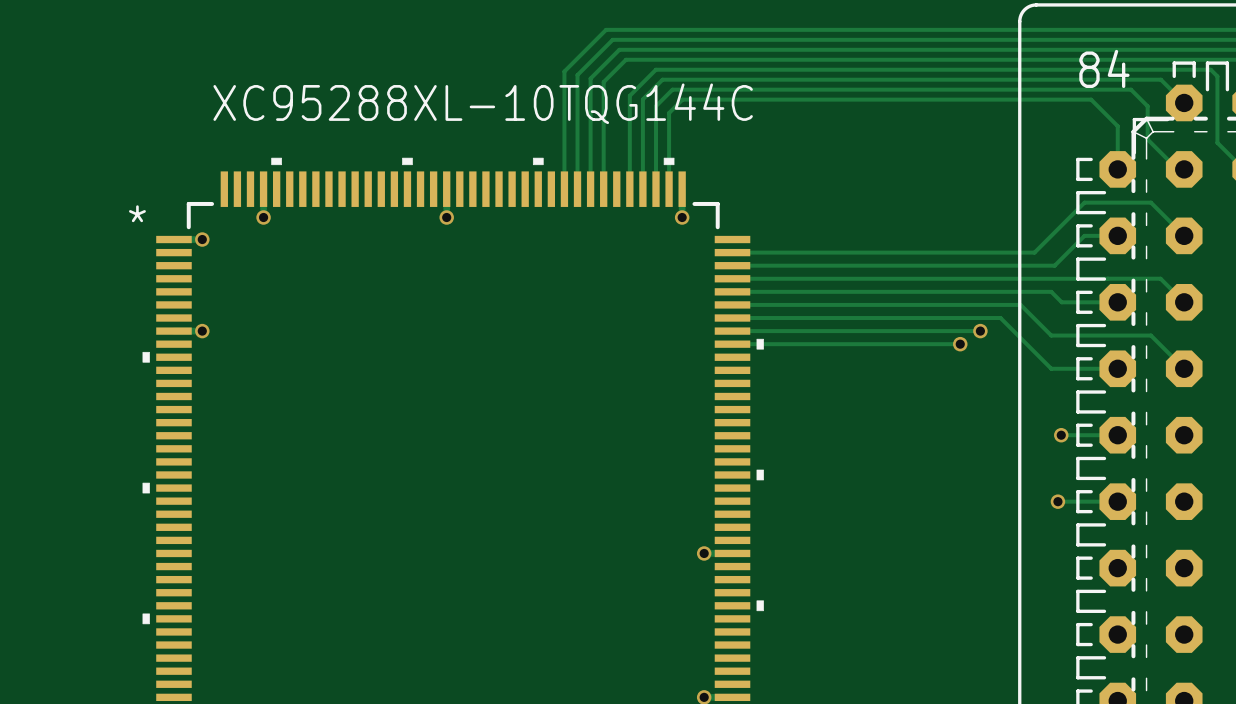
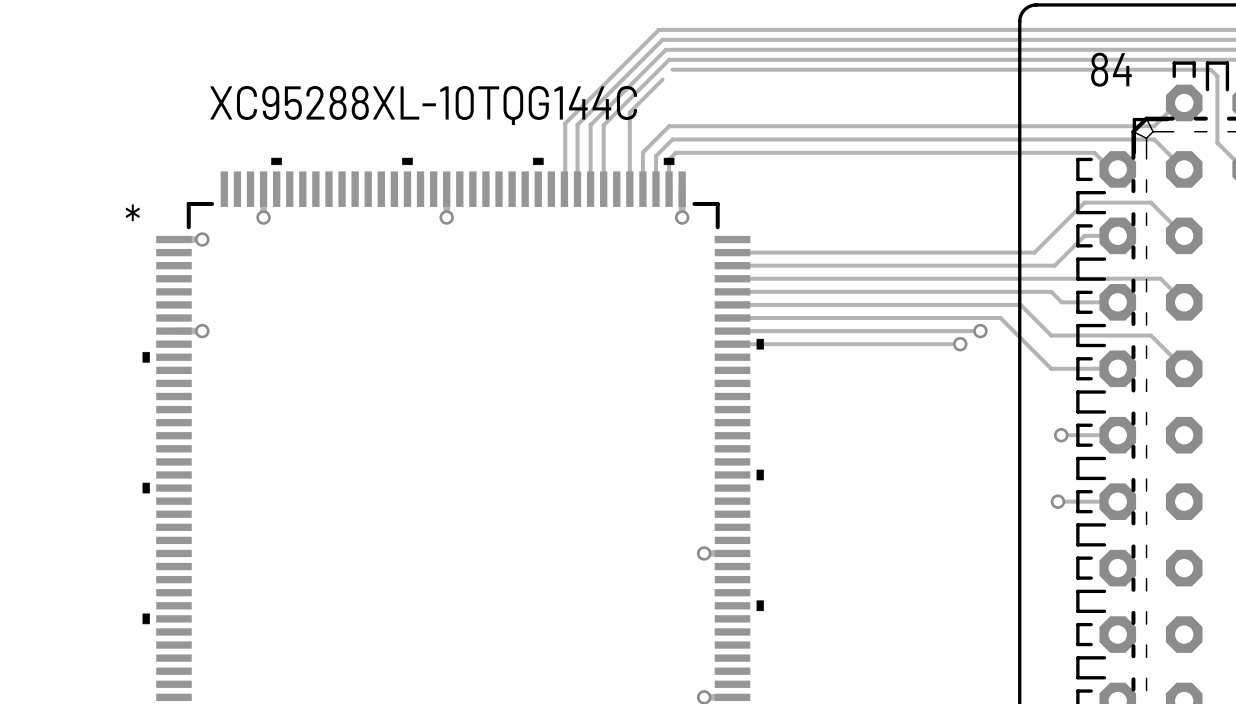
track: (658, 29) (606, 29) (564, 71) (564, 189) -> (658, 29) (565, 123) (564, 189)
track: (662, 39) (612, 39) (577, 75) (577, 124) -> (662, 39) (577, 124)
track: (665, 49) (619, 49) (590, 78) (590, 125) -> (665, 49) (590, 125)
track: (669, 59) (626, 59) (603, 82) (603, 125) -> (669, 59) (603, 125)
track: (672, 69) (655, 69) (629, 95) (629, 112) -> (642, 99) (629, 112)
track: (662, 79) (1160, 79) (1184, 102) -> (642, 152) (669, 126) (1154, 126) (1177, 102) (1184, 102)
track: (642, 99) (642, 152) -> none
track: (656, 156) (656, 106) (672, 89) (1131, 89) (1147, 106) (1147, 139) (1177, 169) (1184, 169) -> (656, 156) (672, 139) (1154, 139) (1184, 169)
track: (669, 159) (669, 113) (682, 99) (1091, 99) (1117, 126) (1117, 169) -> (669, 159) (675, 152) (1094, 152) (1111, 169) (1117, 169)

